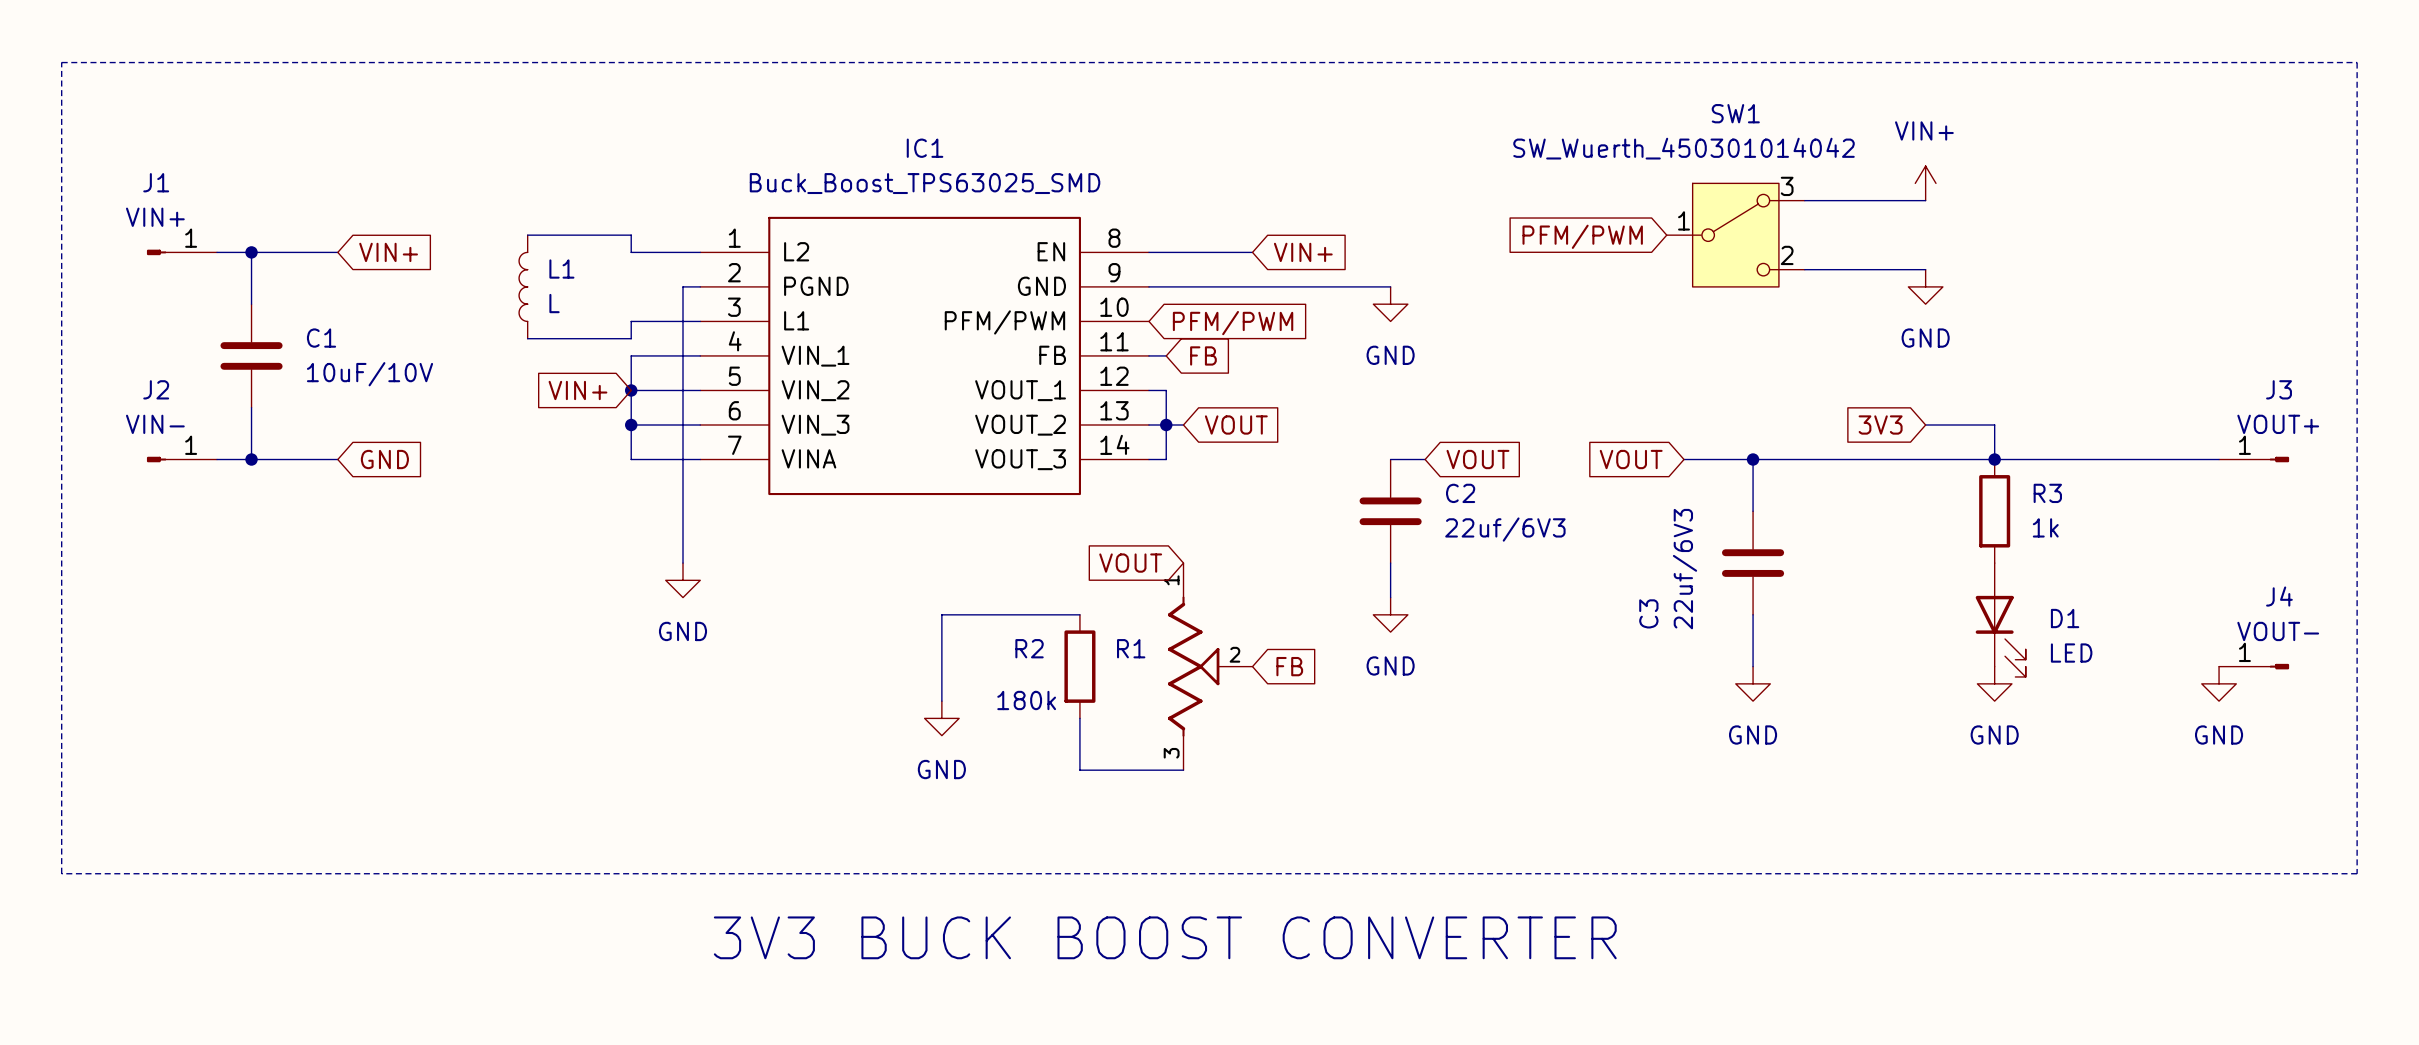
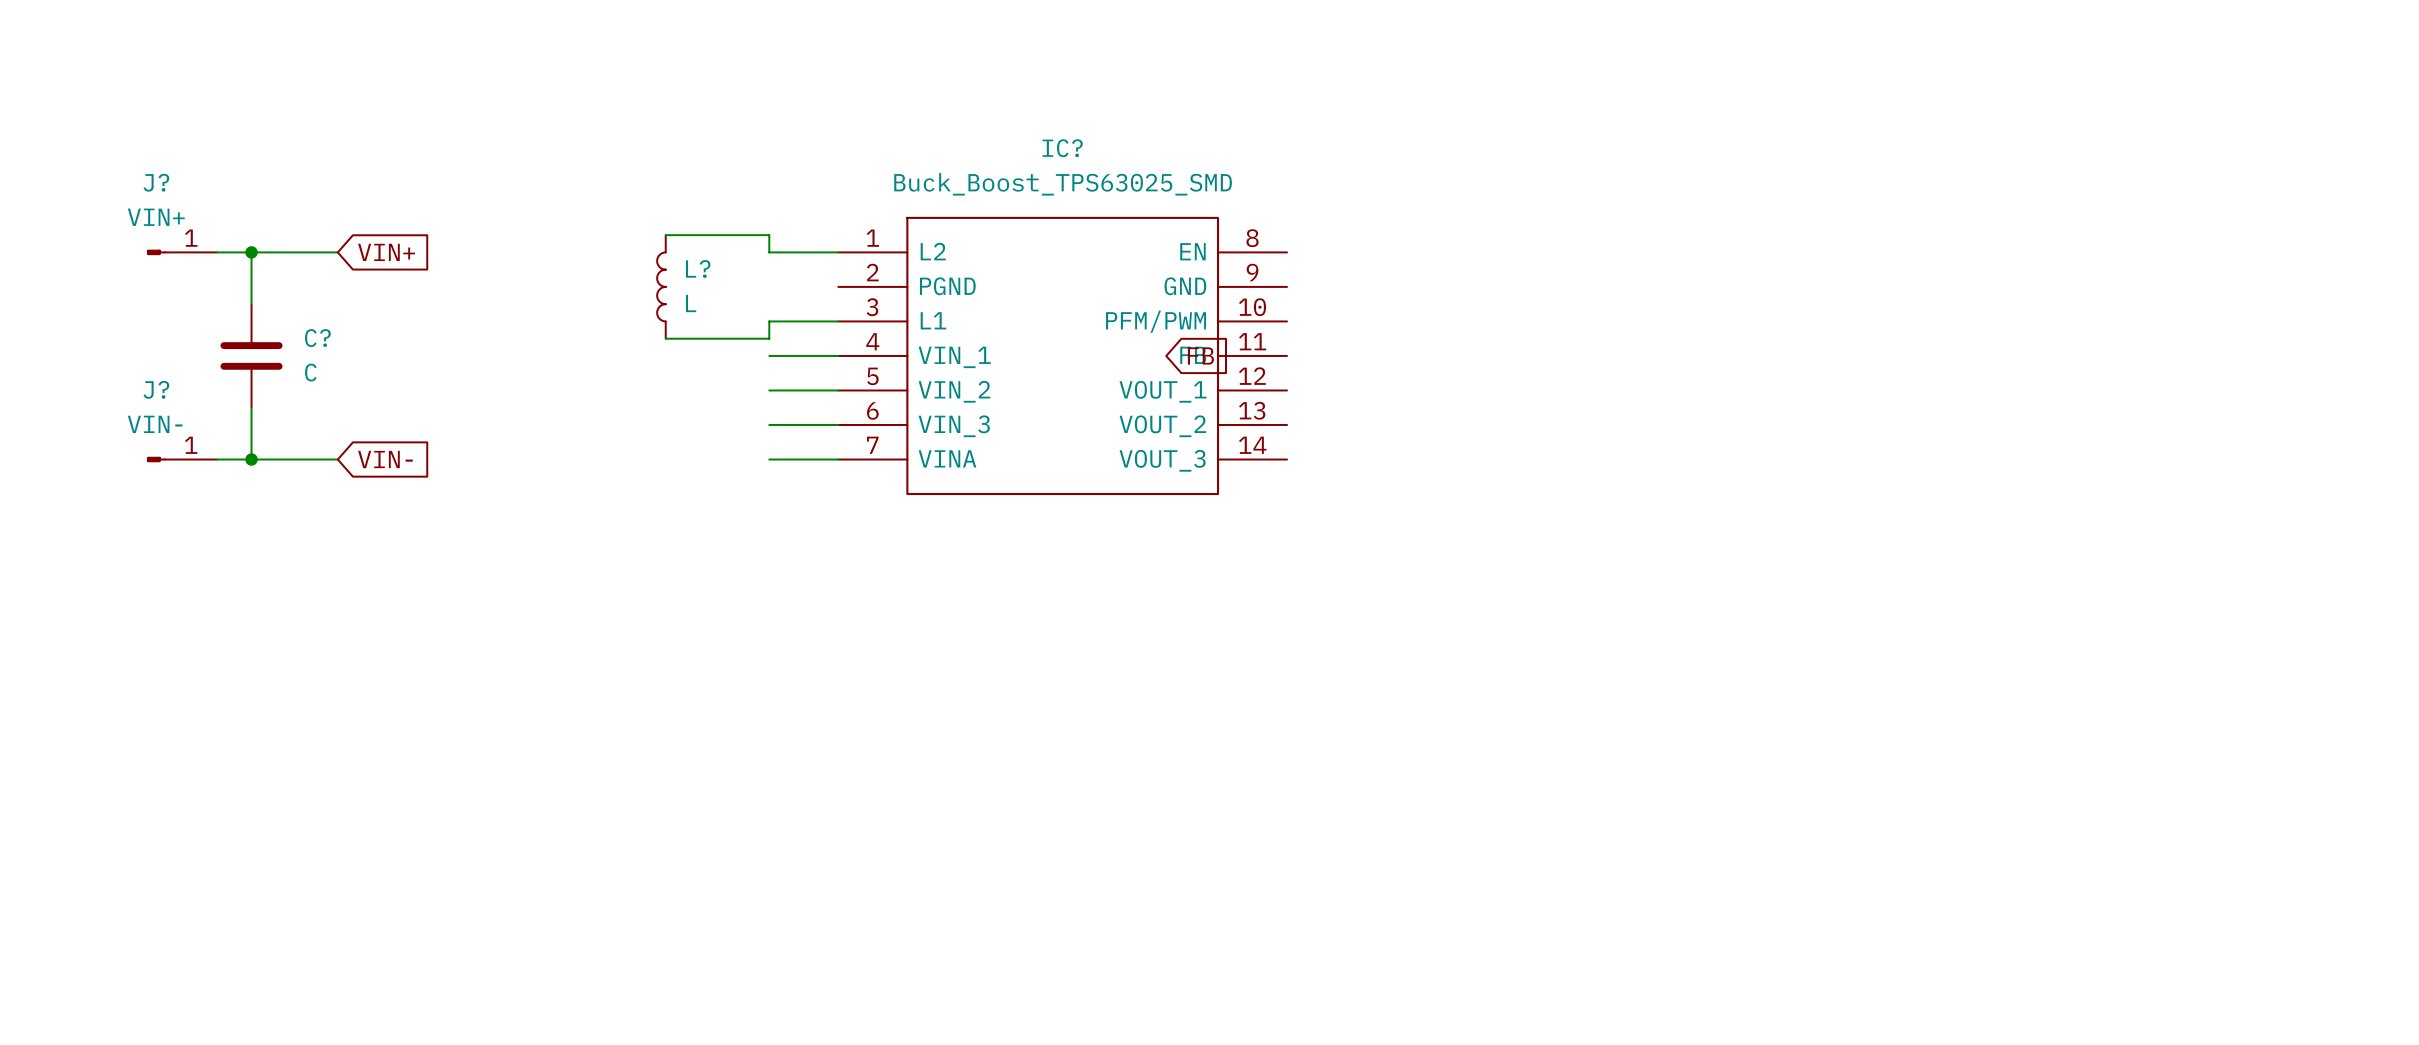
line: (61, 62) (2357, 62) (2357, 873) (61, 873) (61, 62) -> none
J1 name: J1 (156, 182) -> J? (156, 182)
power symbol: VIN+ (1925, 183) -> none
wire: (1804, 200) (1925, 200) -> none
wire: (527, 235) (631, 235) (631, 252) (700, 252) -> (665, 235) (769, 235) (769, 252) (838, 252)
SW1: SW_Wuerth_450301014042 (1735, 235) -> none
global label: PFM/PWM (1582, 236) -> none
wire: (1148, 252) (1252, 252) -> none
global label: VIN+ (1303, 252) -> none
wire: (1804, 269) (1925, 269) -> none
L1: L (523, 286) -> none
L?: none -> L (661, 286)
wire: (700, 286) (683, 286) (683, 563) -> none
wire: (1148, 286) (1390, 286) -> none
power symbol: GND (1925, 286) -> none
power symbol: GND (1390, 304) -> none
wire: (700, 321) (631, 321) (631, 338) (527, 338) -> (838, 321) (769, 321) (769, 338) (665, 338)
global label: PFM/PWM (1233, 323) -> none
C1 name: C1 (321, 338) -> C? (317, 338)
wire: (700, 355) (631, 355) (631, 459) (700, 459) -> none
wire: none -> (769, 355) (838, 355)
IC1: Buck_Boost_TPS63025_SMD (924, 355) -> none
IC?: none -> Buck_Boost_TPS63025_SMD (1062, 355)
wire: (1148, 355) (1166, 355) -> none
C1 value: 10uF/10V (370, 374) -> C (310, 372)
J2 name: J2 (156, 389) -> J? (156, 389)
global label: VIN+ (577, 390) -> none
wire: (631, 390) (700, 390) -> (769, 390) (838, 390)
junction: (631, 390) -> none
wire: (1148, 390) (1166, 390) (1166, 459) (1148, 459) -> none
wire: (631, 424) (700, 424) -> (769, 424) (838, 424)
junction: (631, 424) -> none
wire: (1148, 424) (1183, 424) -> none
junction: (1166, 424) -> none
global label: VOUT (1236, 424) -> none
global label: 3V3 (1880, 424) -> none
wire: (1925, 424) (1994, 424) (1994, 459) -> none
global label: GND (384, 459) -> VIN- (385, 459)
wire: none -> (769, 459) (838, 459)
wire: (1390, 459) (1425, 459) -> none
global label: VOUT (1477, 459) -> none
global label: VOUT (1631, 459) -> none
wire: (1684, 459) (2219, 459) -> none
wire: (1753, 459) (1753, 511) -> none
junction: (1753, 459) -> none
junction: (1994, 459) -> none
J3: VOUT+ (2254, 459) -> none
C2: 22uf/6V3 (1390, 511) -> none
R3: 1k (1994, 511) -> none
global label: VOUT (1130, 563) -> none
wire: (1390, 563) (1390, 597) -> none
C3: 22uf/6V3 (1753, 563) -> none
power symbol: GND (683, 580) -> none
wire: (1079, 614) (941, 614) (941, 701) -> none
power symbol: GND (1390, 614) -> none
wire: (1753, 614) (1753, 666) -> none
D1: LED (2000, 620) -> none
R2: 180k (1079, 666) -> none
R1: (1210, 666) -> none
global label: FB (1289, 666) -> none
J4: VOUT- (2254, 666) -> none
power symbol: GND (1753, 683) -> none
power symbol: GND (1994, 683) -> none
power symbol: GND (2219, 683) -> none
power symbol: GND (941, 718) -> none
wire: (1079, 718) (1079, 770) (1183, 770) -> none
text: 3V3 BUCK BOOST CONVERTER (1165, 937) -> none

